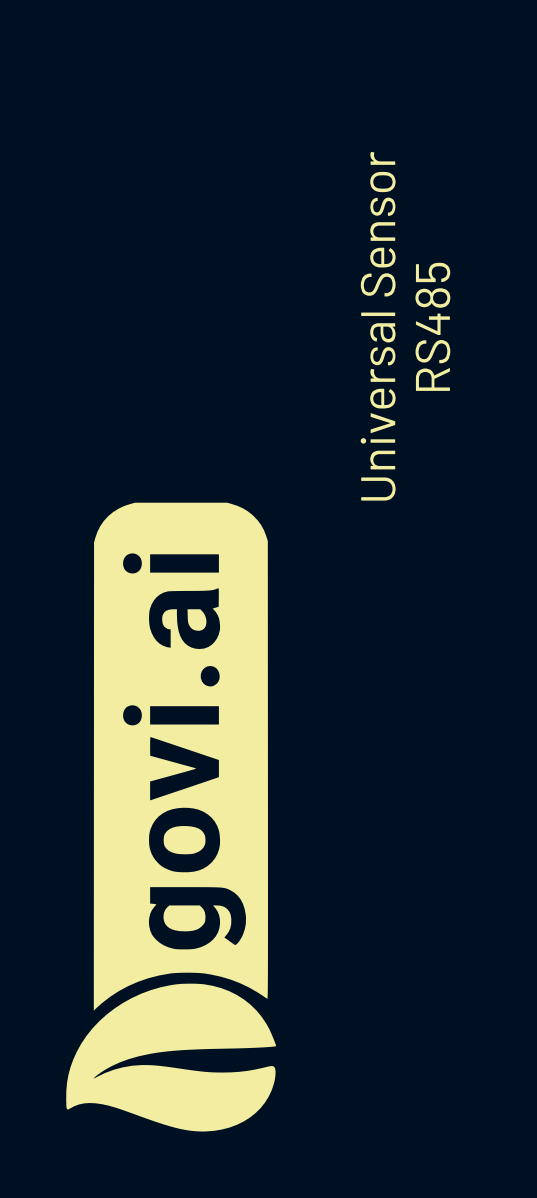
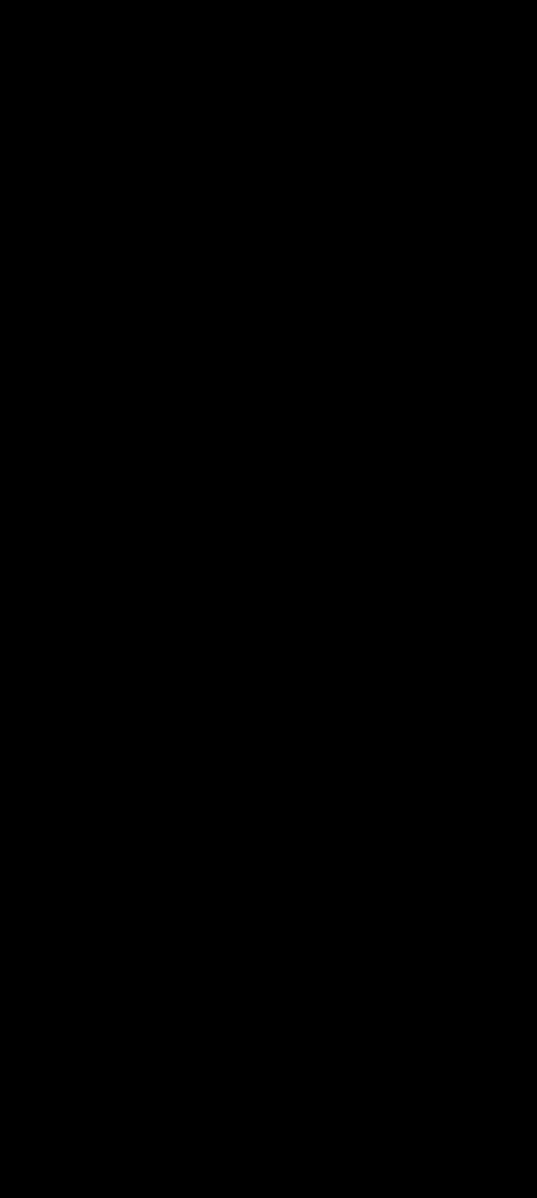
text: Universal Sensor (378, 326) -> none
text: RS485 (432, 326) -> none
drawing: [66, 502, 277, 1132] -> none

